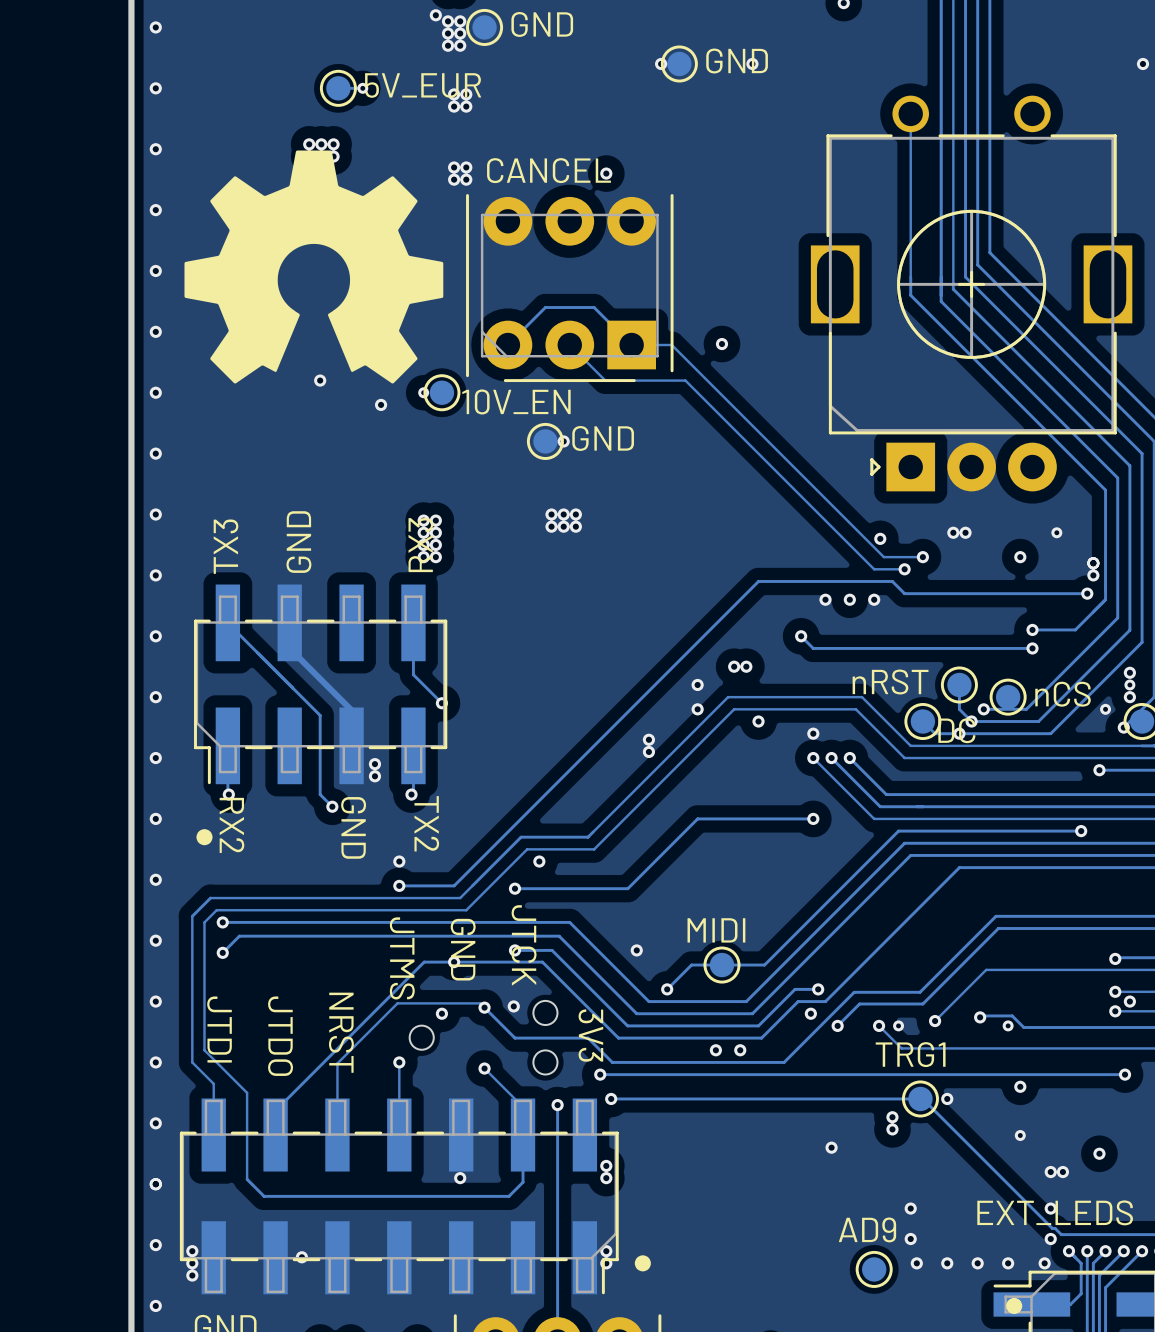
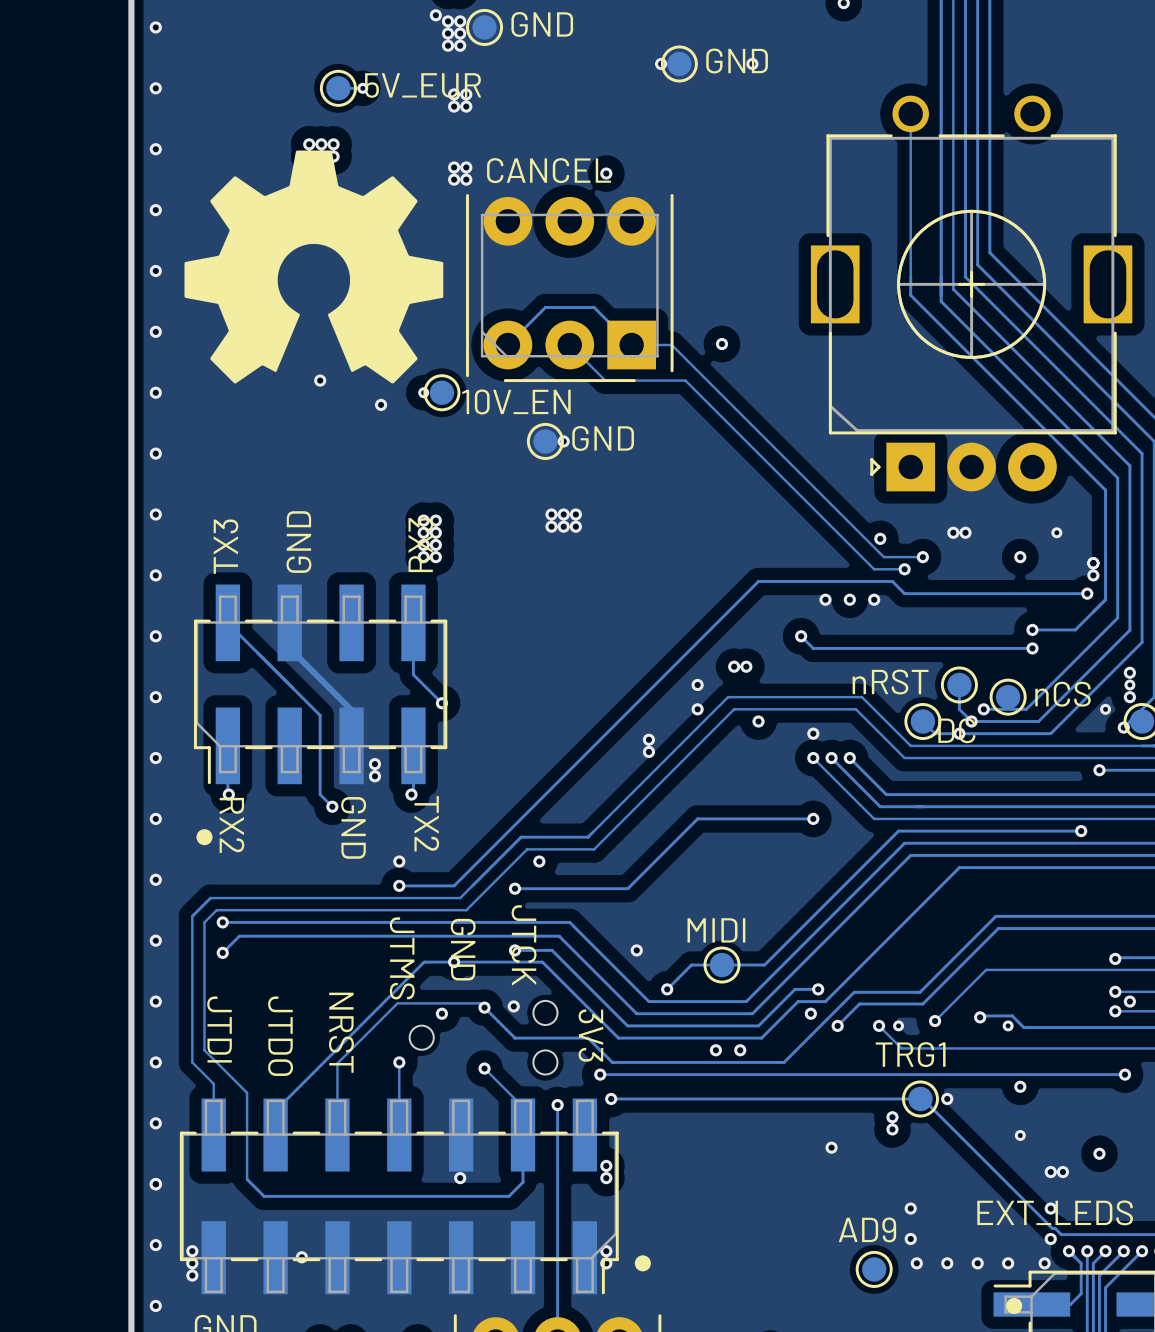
via: (1142, 63) -> none

